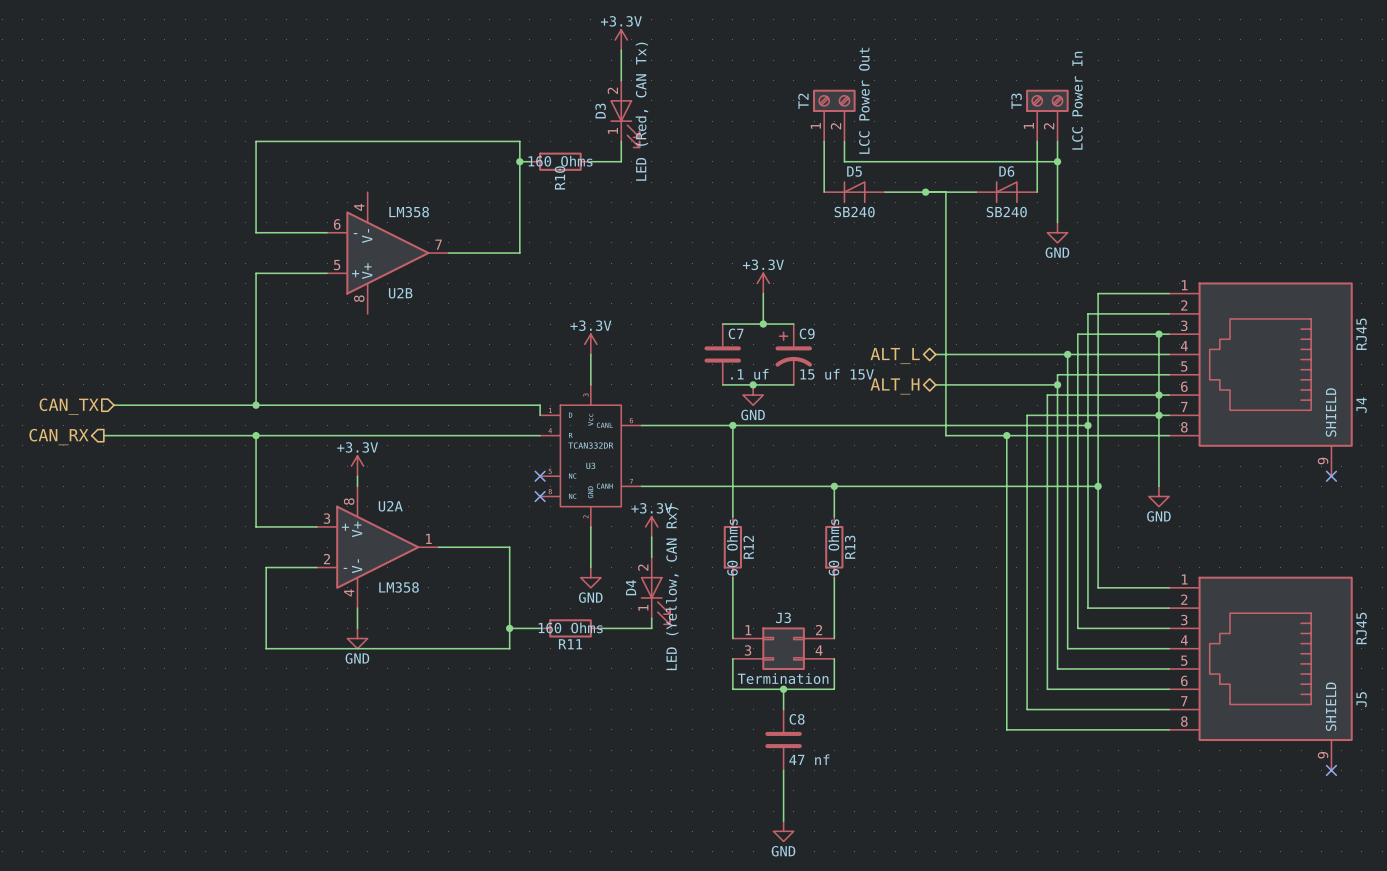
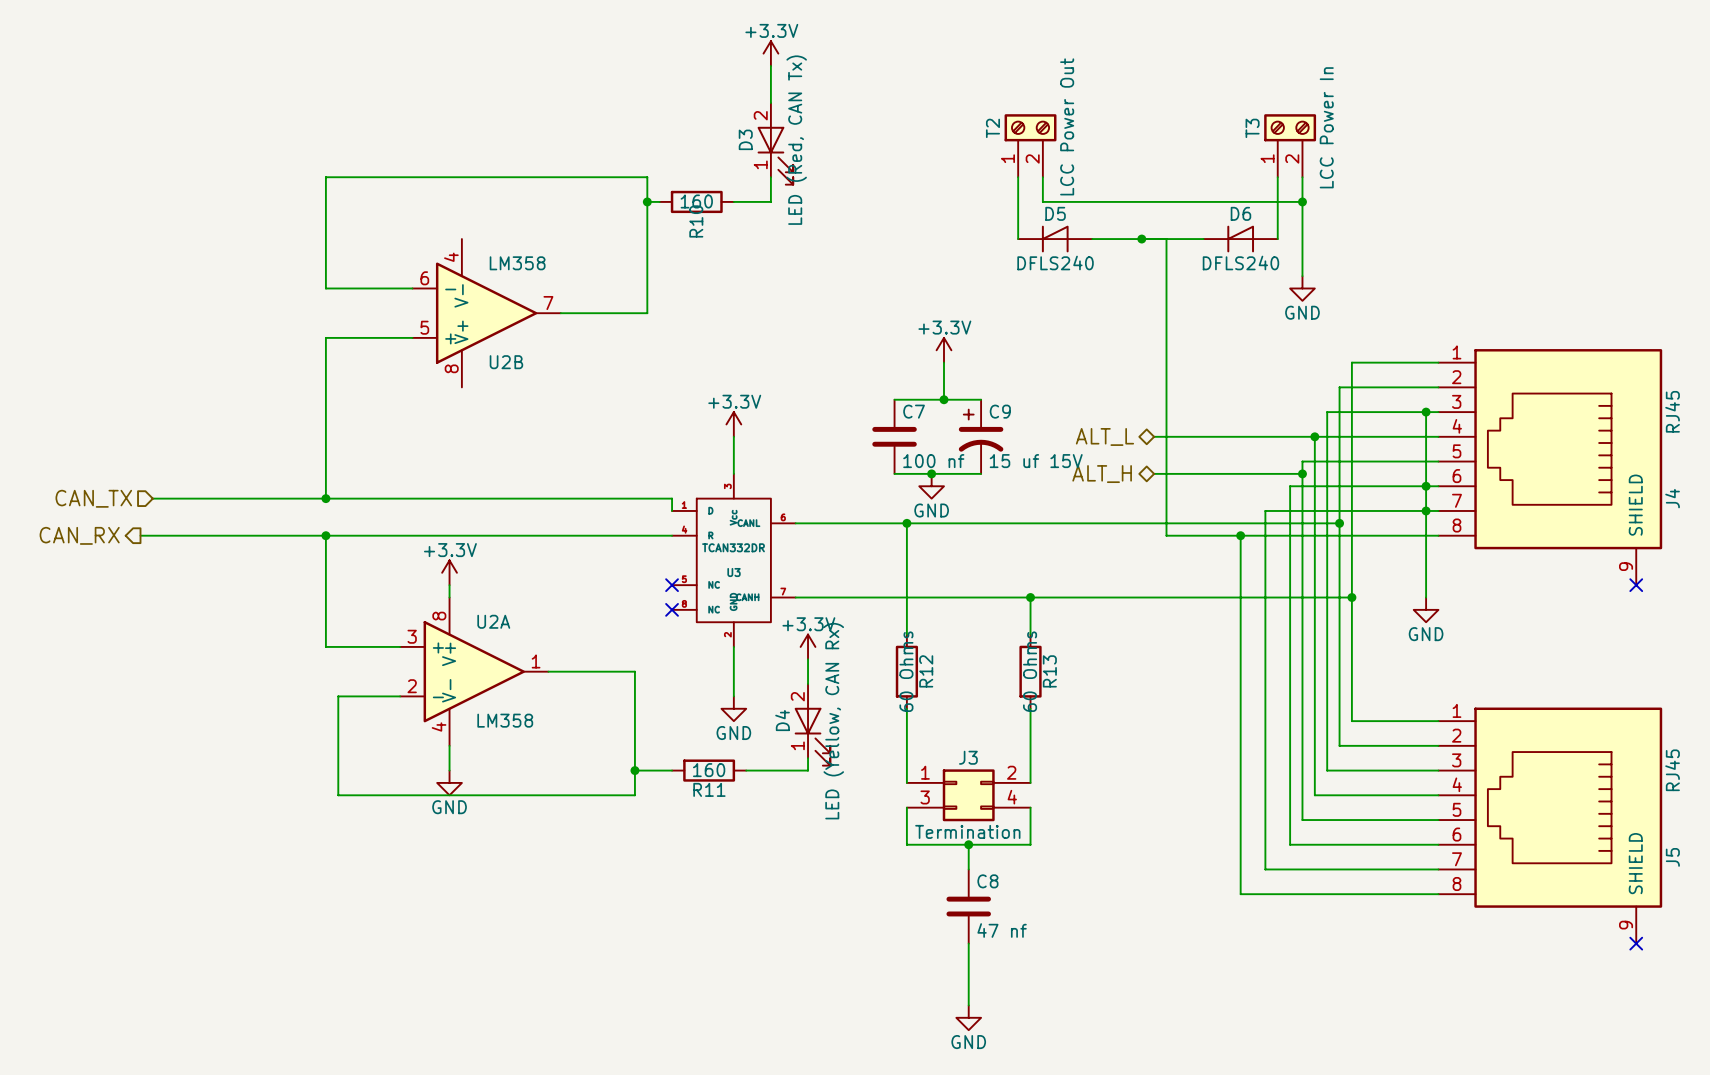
R10 value: 160 Ohms (560, 161) -> 160 (696, 201)
D5 value: SB240 (854, 212) -> DFLS240 (1055, 263)
D6 value: SB240 (1006, 212) -> DFLS240 (1240, 263)
C7 value: .1 uf (749, 374) -> 100 nf (933, 461)
R11 value: 160 Ohms (570, 627) -> 160 (709, 770)

